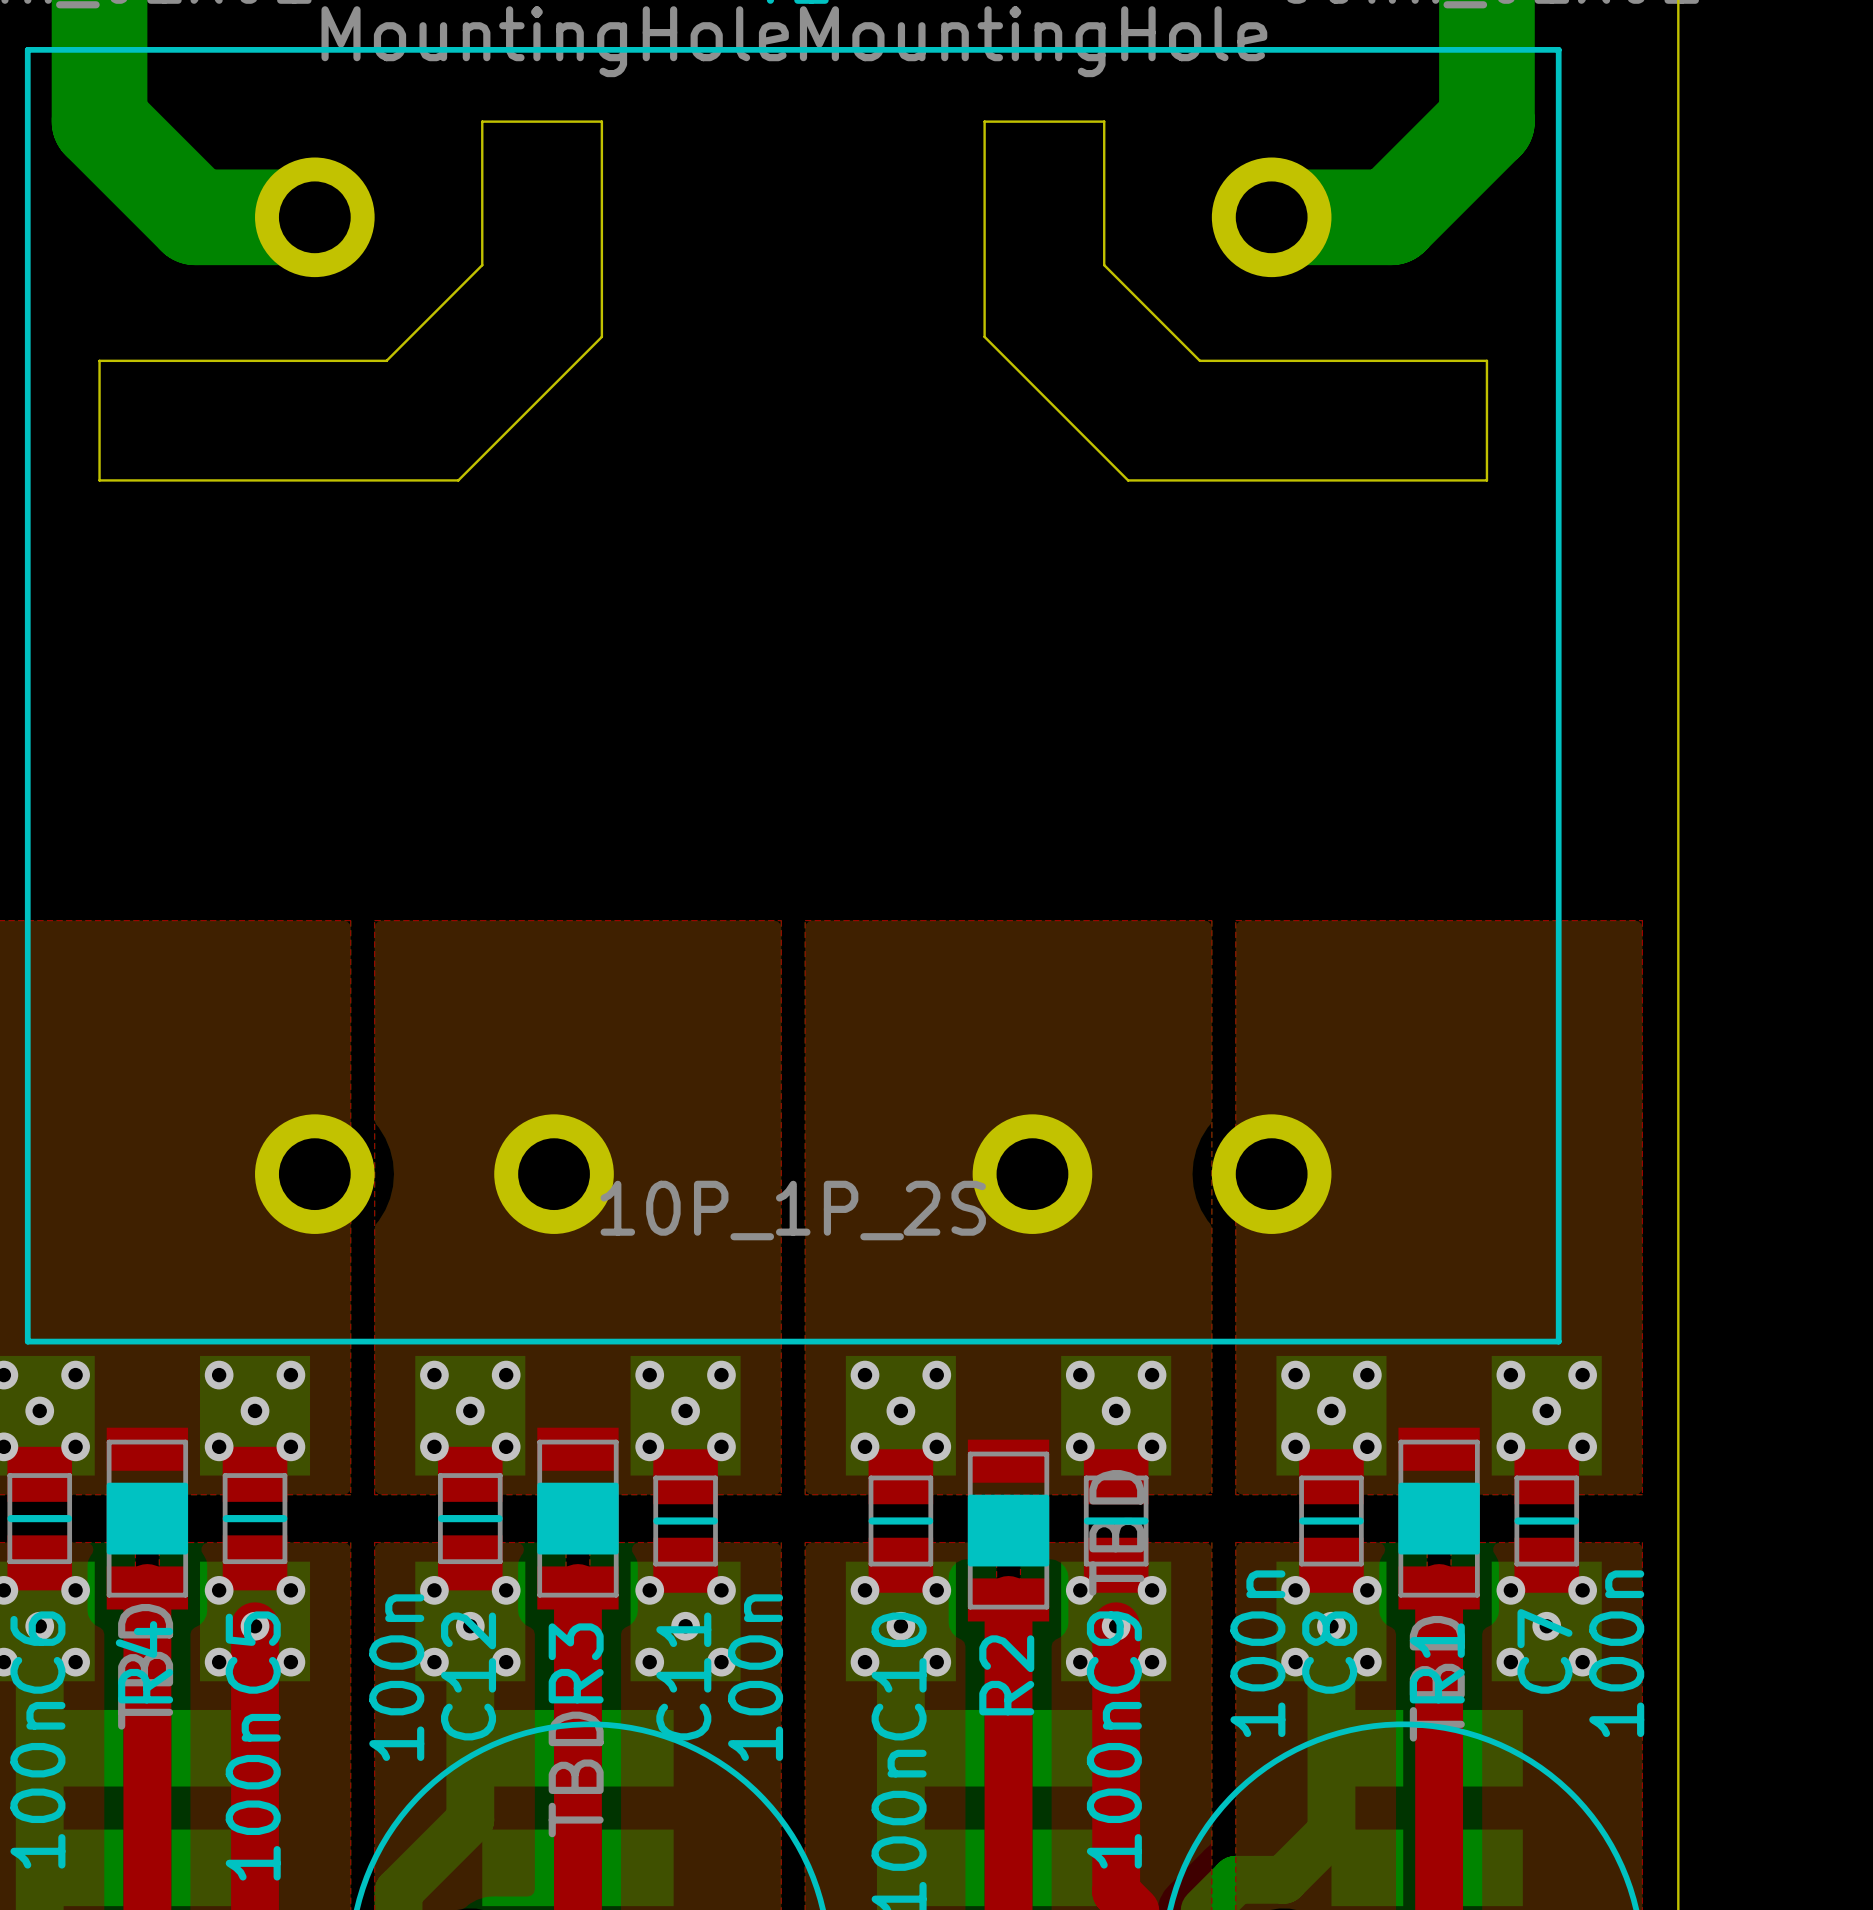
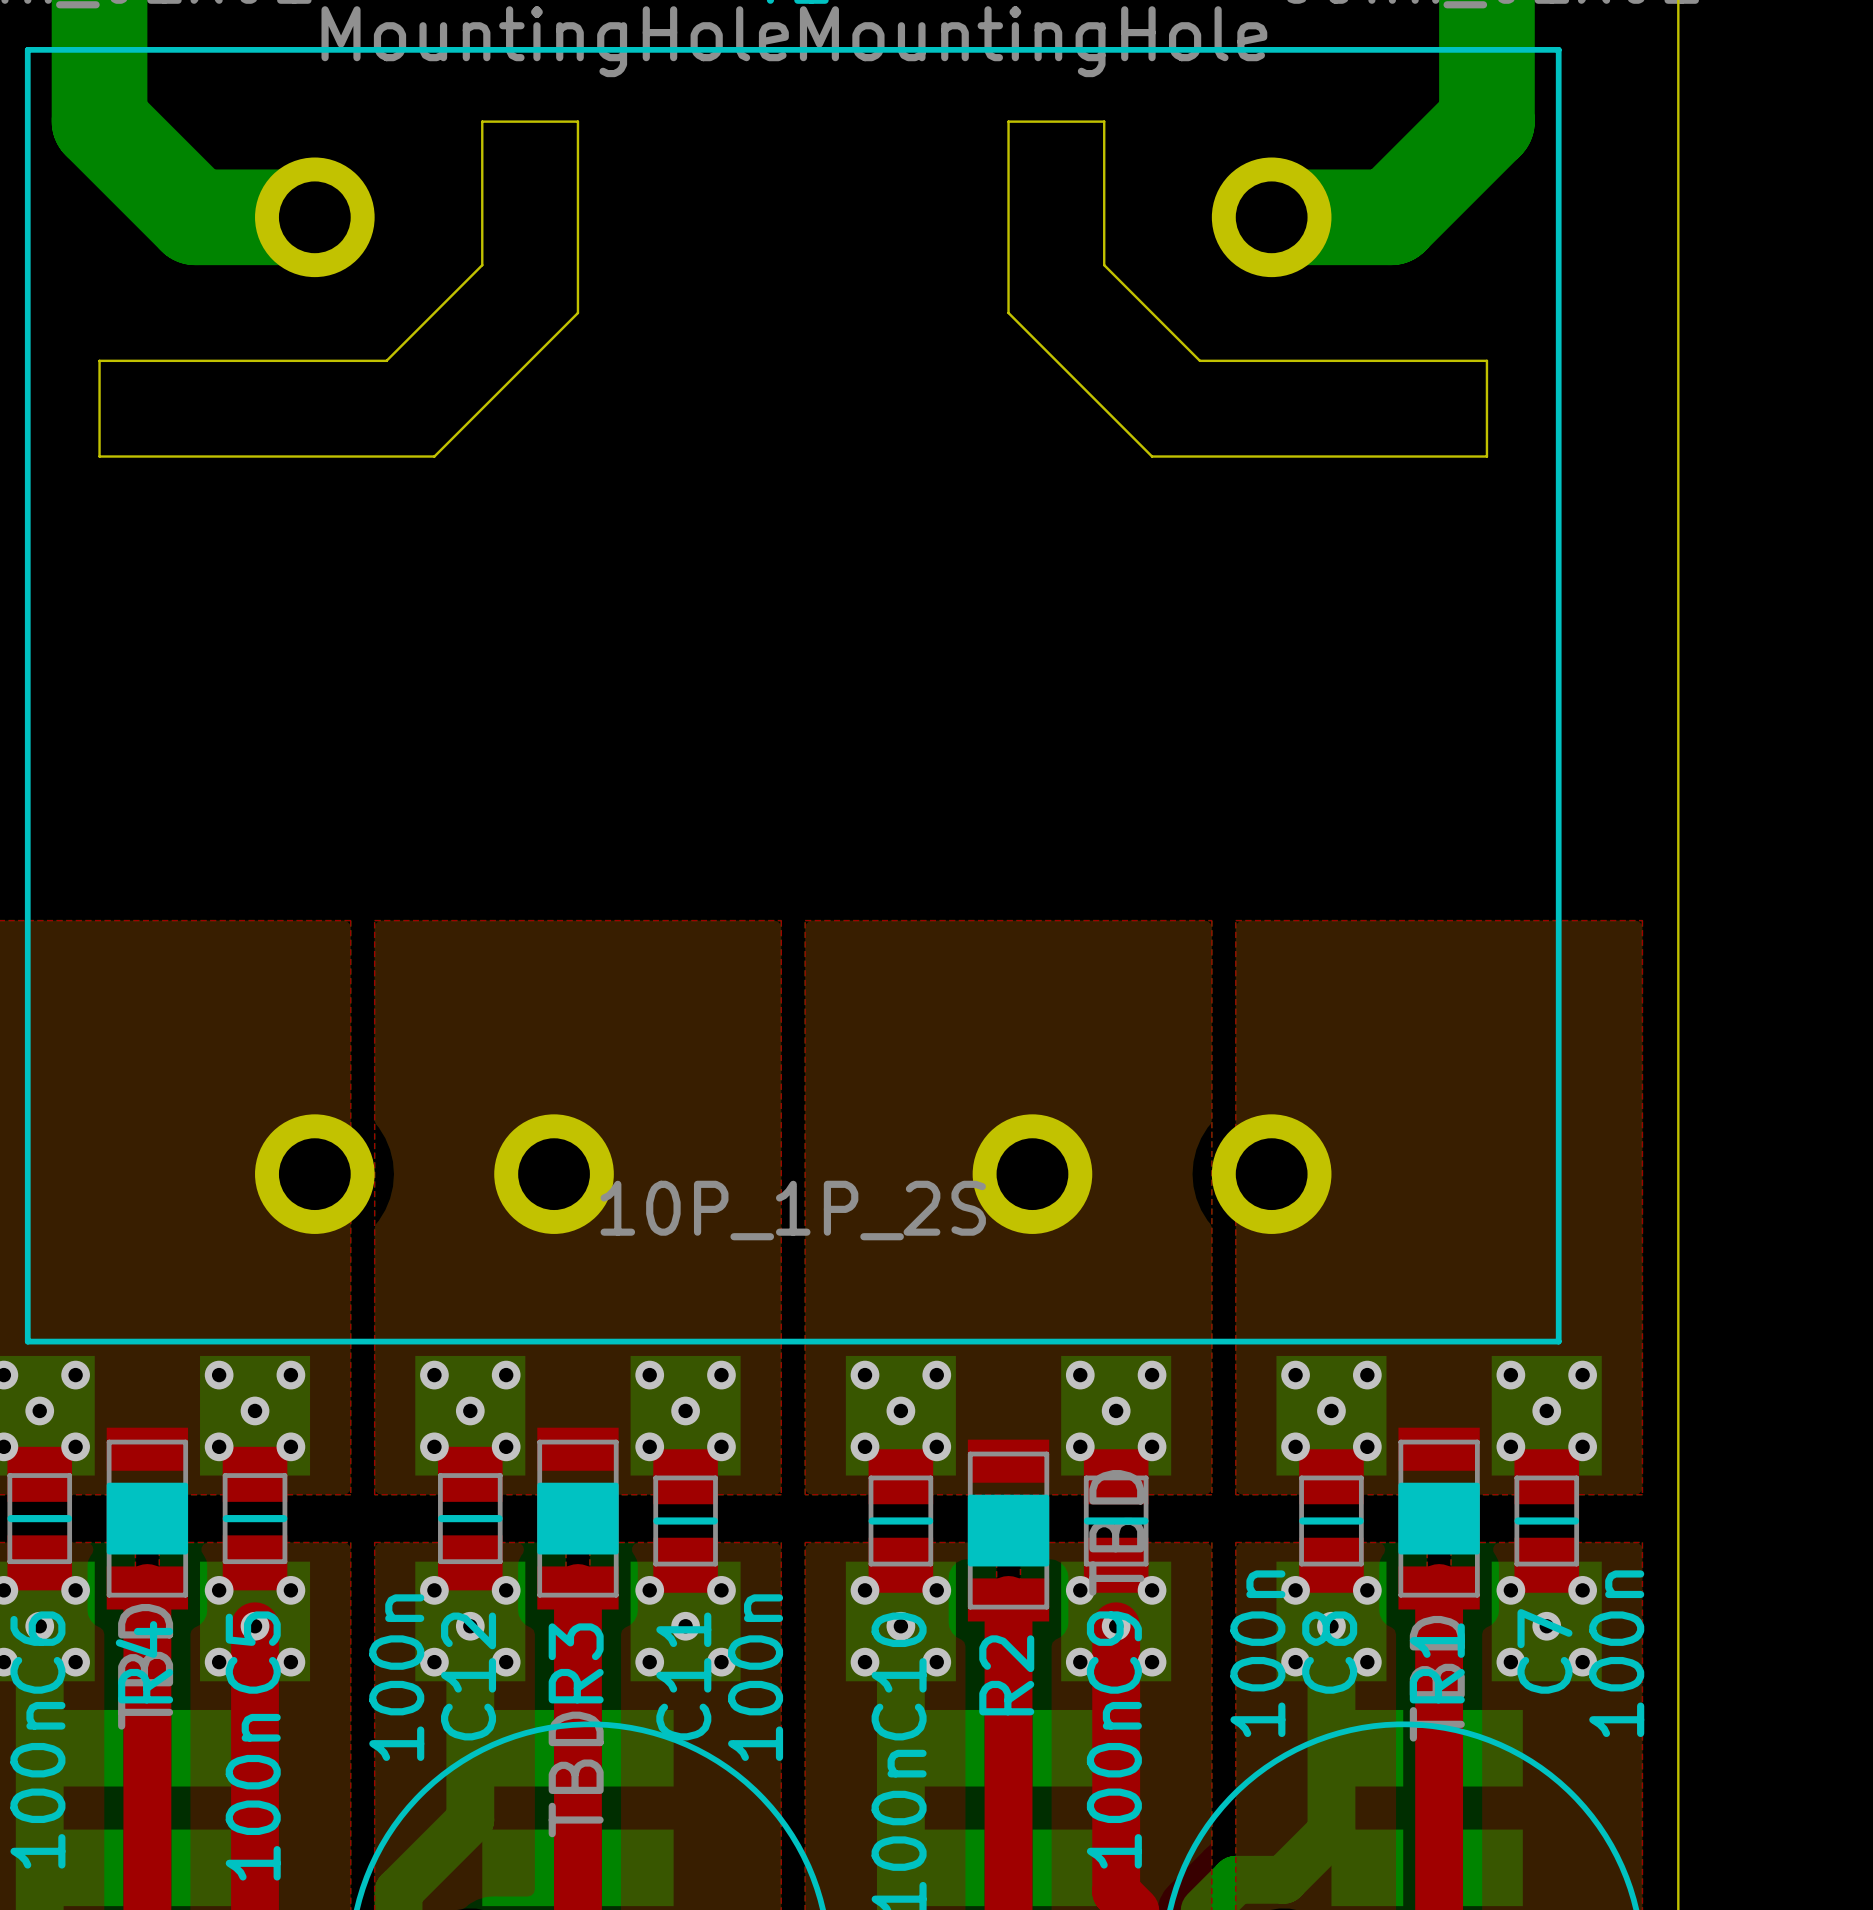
board edge: (577, 121) (601, 121) (601, 336) (458, 480) (99, 480) (99, 456) -> (577, 121) (577, 312) (434, 456) (99, 456)
board edge: (1008, 121) (984, 121) (984, 336) (1128, 480) (1486, 480) (1486, 456) -> (1008, 121) (1008, 312) (1152, 456) (1486, 456)

